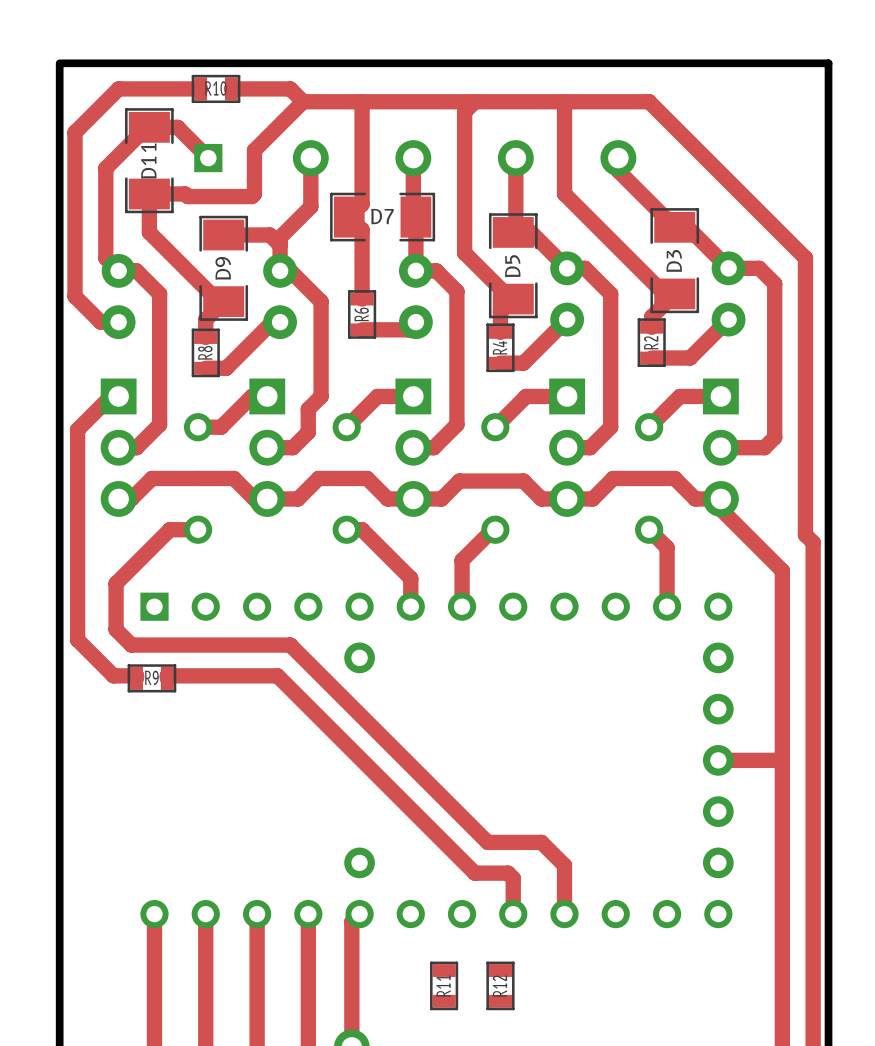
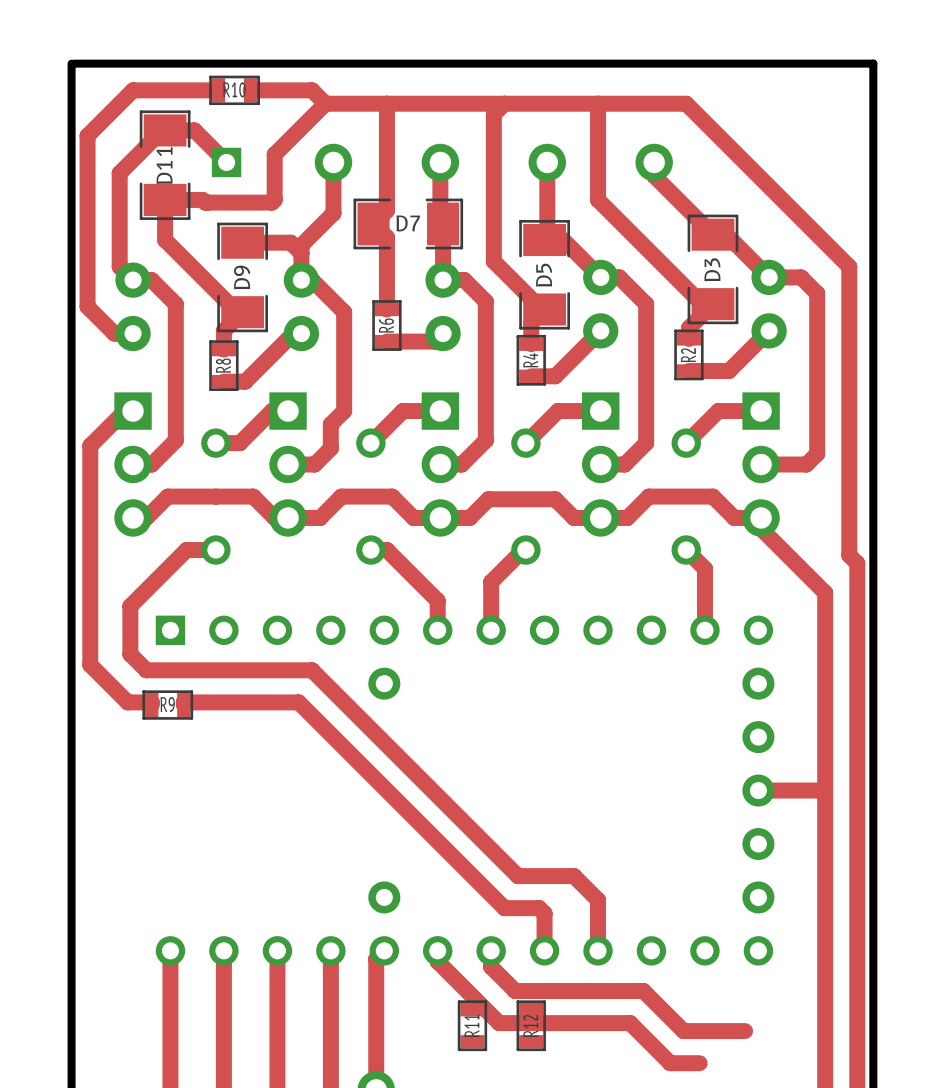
track: none -> (437, 950) (437, 961) (499, 1023) (630, 1023) (670, 1063) (699, 1063)
track: none -> (491, 950) (491, 966) (515, 990) (643, 990) (683, 1031) (745, 1031)

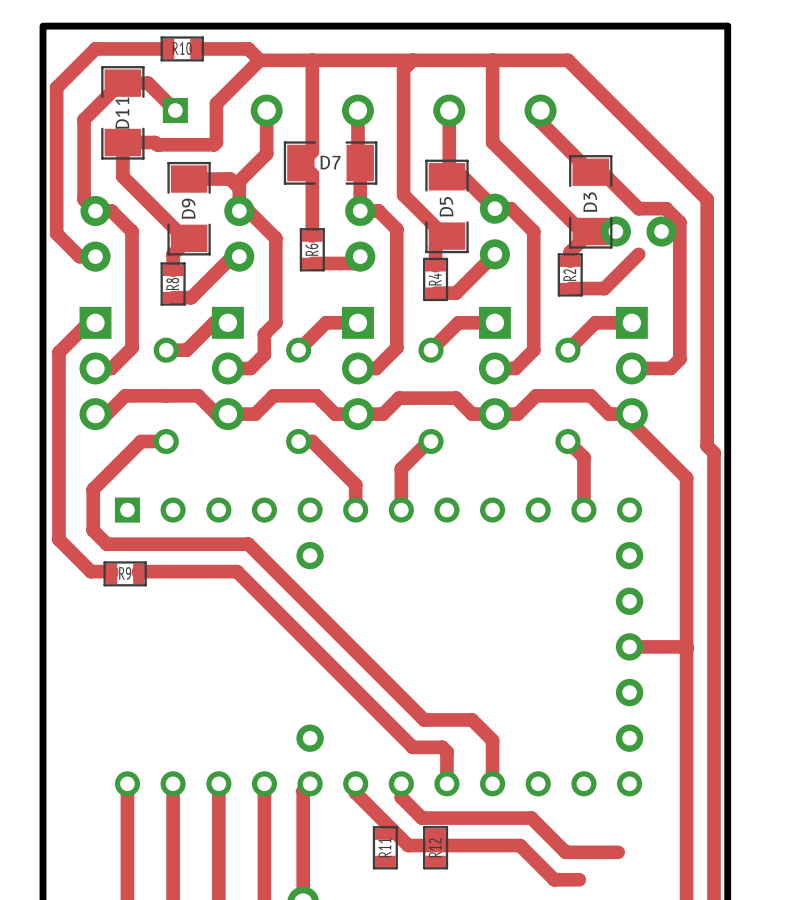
part rotation: 0° (769, 304) -> 90° clockwise (638, 231)

